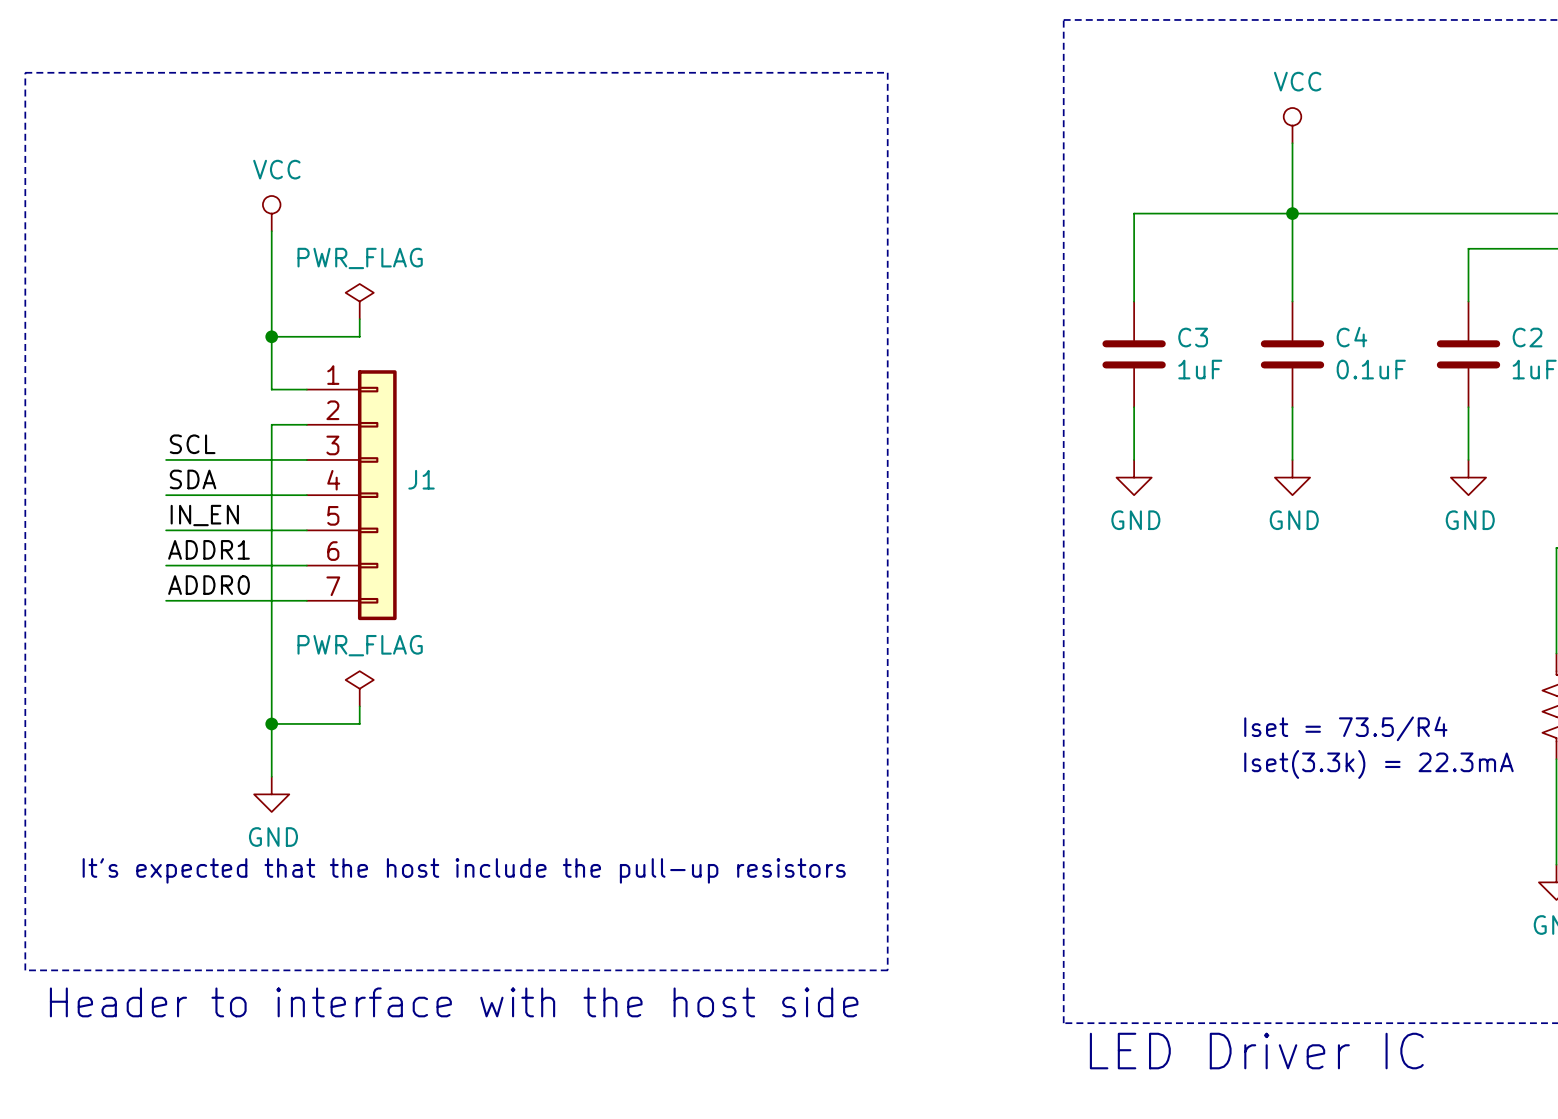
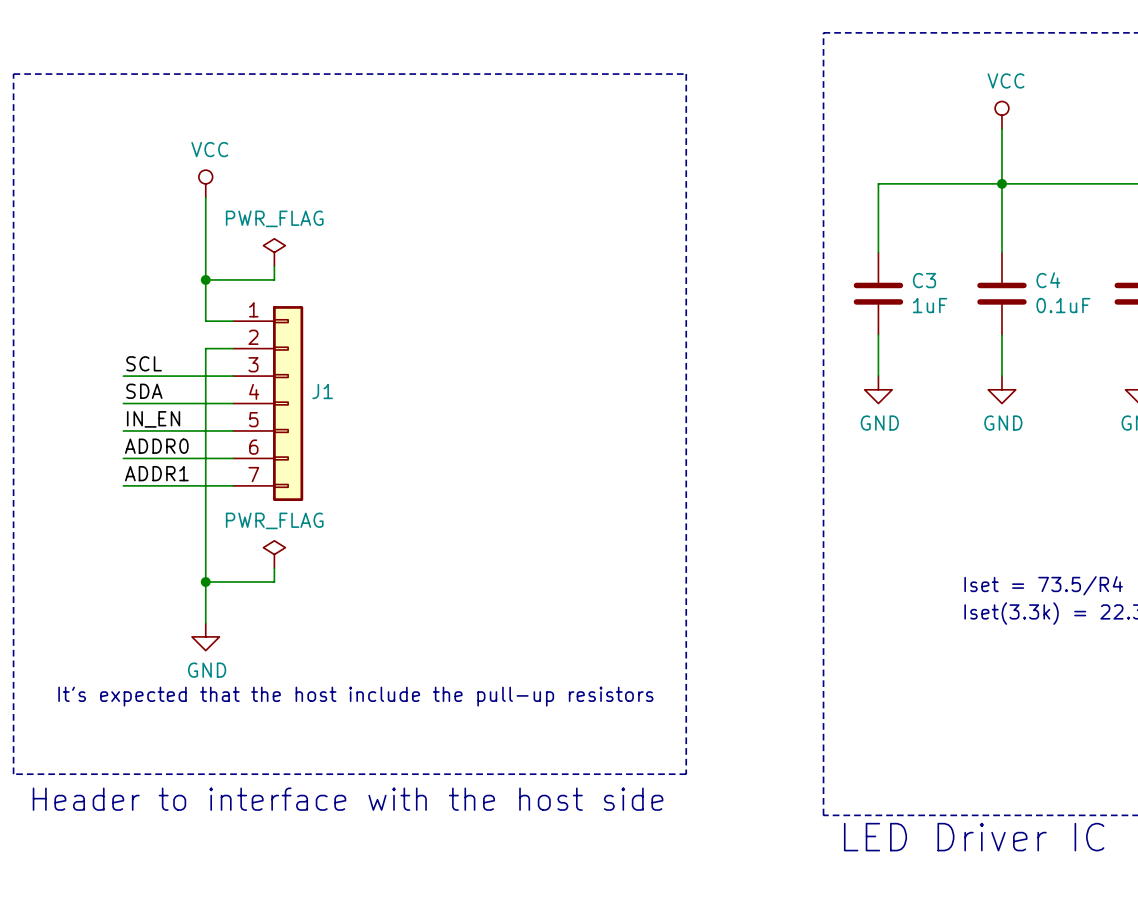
label: ADDR1 (208, 549) -> ADDR0 (156, 446)
label: ADDR0 (208, 585) -> ADDR1 (156, 473)

